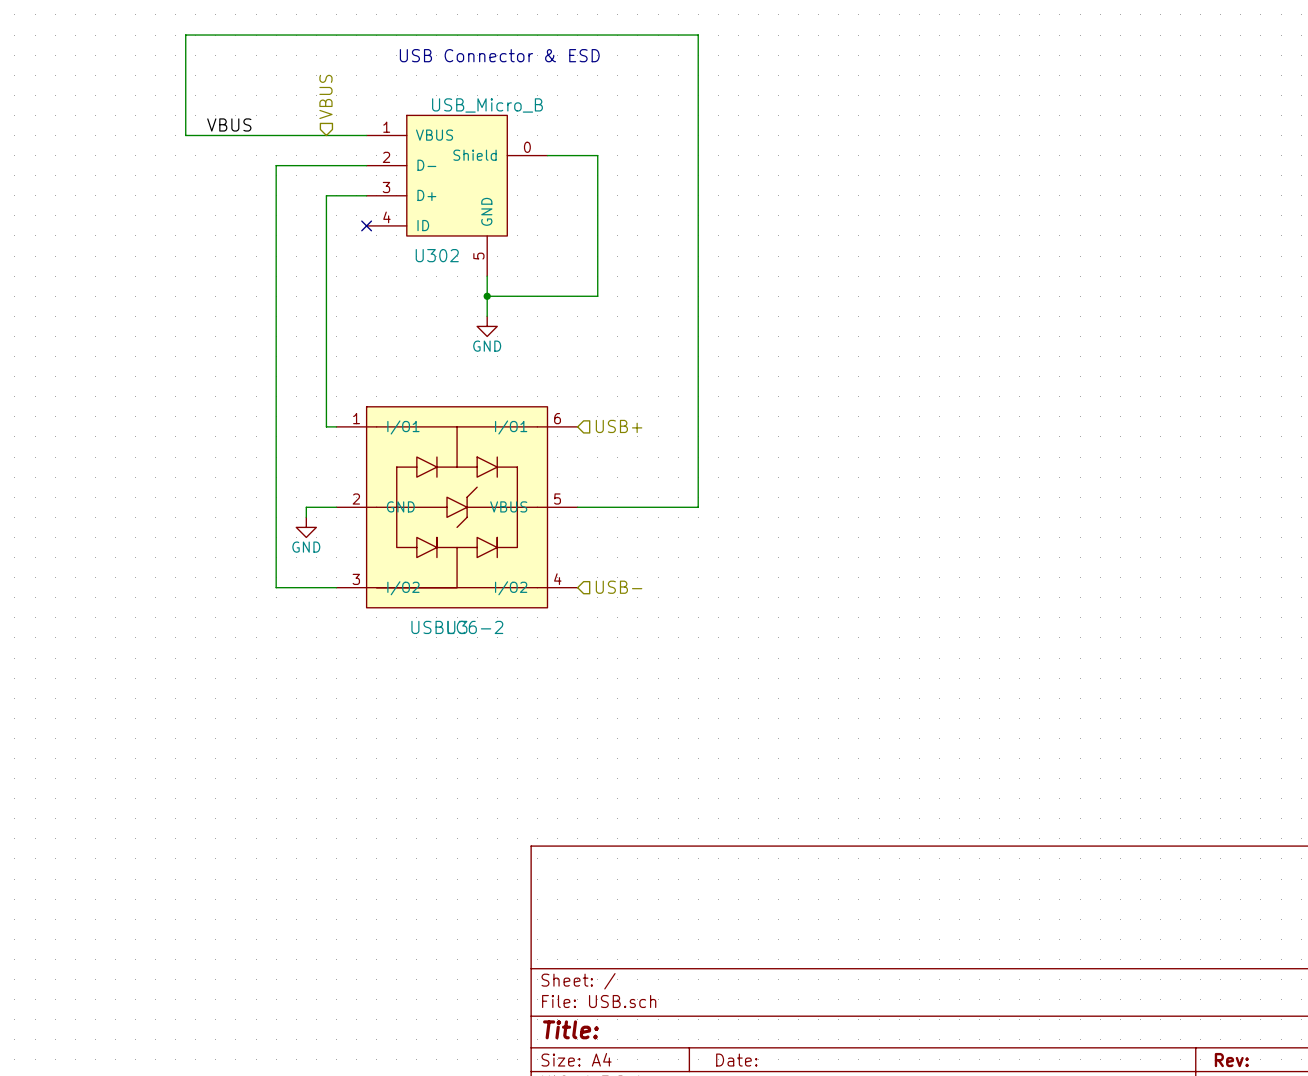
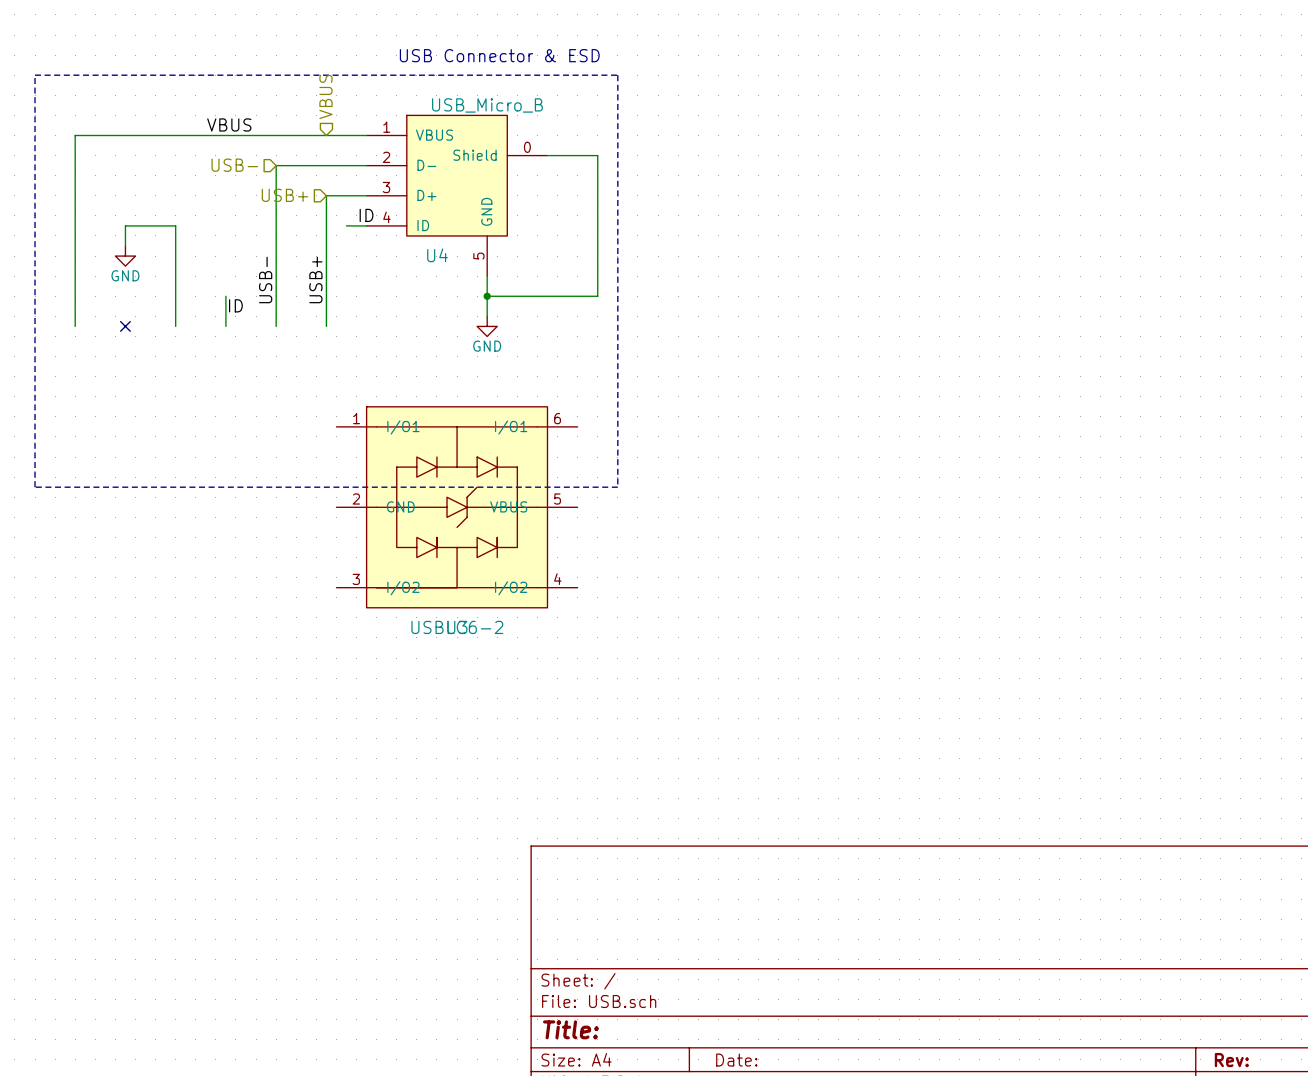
line: none -> (35, 75) (617, 75) (617, 487) (35, 487) (35, 75)
wire: (185, 135) (185, 35) (698, 35) (698, 507) (577, 507) -> (185, 135) (75, 135) (75, 326)
hierarchical label: none -> USB- (234, 165)
hierarchical label: none -> USB+ (285, 195)
label: none -> ID (366, 215)
wire: none -> (346, 225) (366, 225)
no-connect mark: (366, 225) -> none
wire: none -> (125, 246) (125, 225) (175, 225) (175, 326)
U302 name: U302 (437, 255) -> U4 (437, 255)
power symbol: none -> GND (125, 256)
label: none -> USB- (265, 279)
label: none -> USB+ (315, 279)
wire: none -> (225, 296) (225, 326)
label: none -> ID (235, 305)
no-connect mark: none -> (125, 326)
wire: (276, 326) (276, 587) (336, 587) -> none
wire: (326, 326) (326, 426) (336, 426) -> none
hierarchical label: USB+ (619, 426) -> none
wire: (336, 507) (306, 507) (306, 517) -> none
power symbol: GND (306, 527) -> none
hierarchical label: USB- (619, 587) -> none

